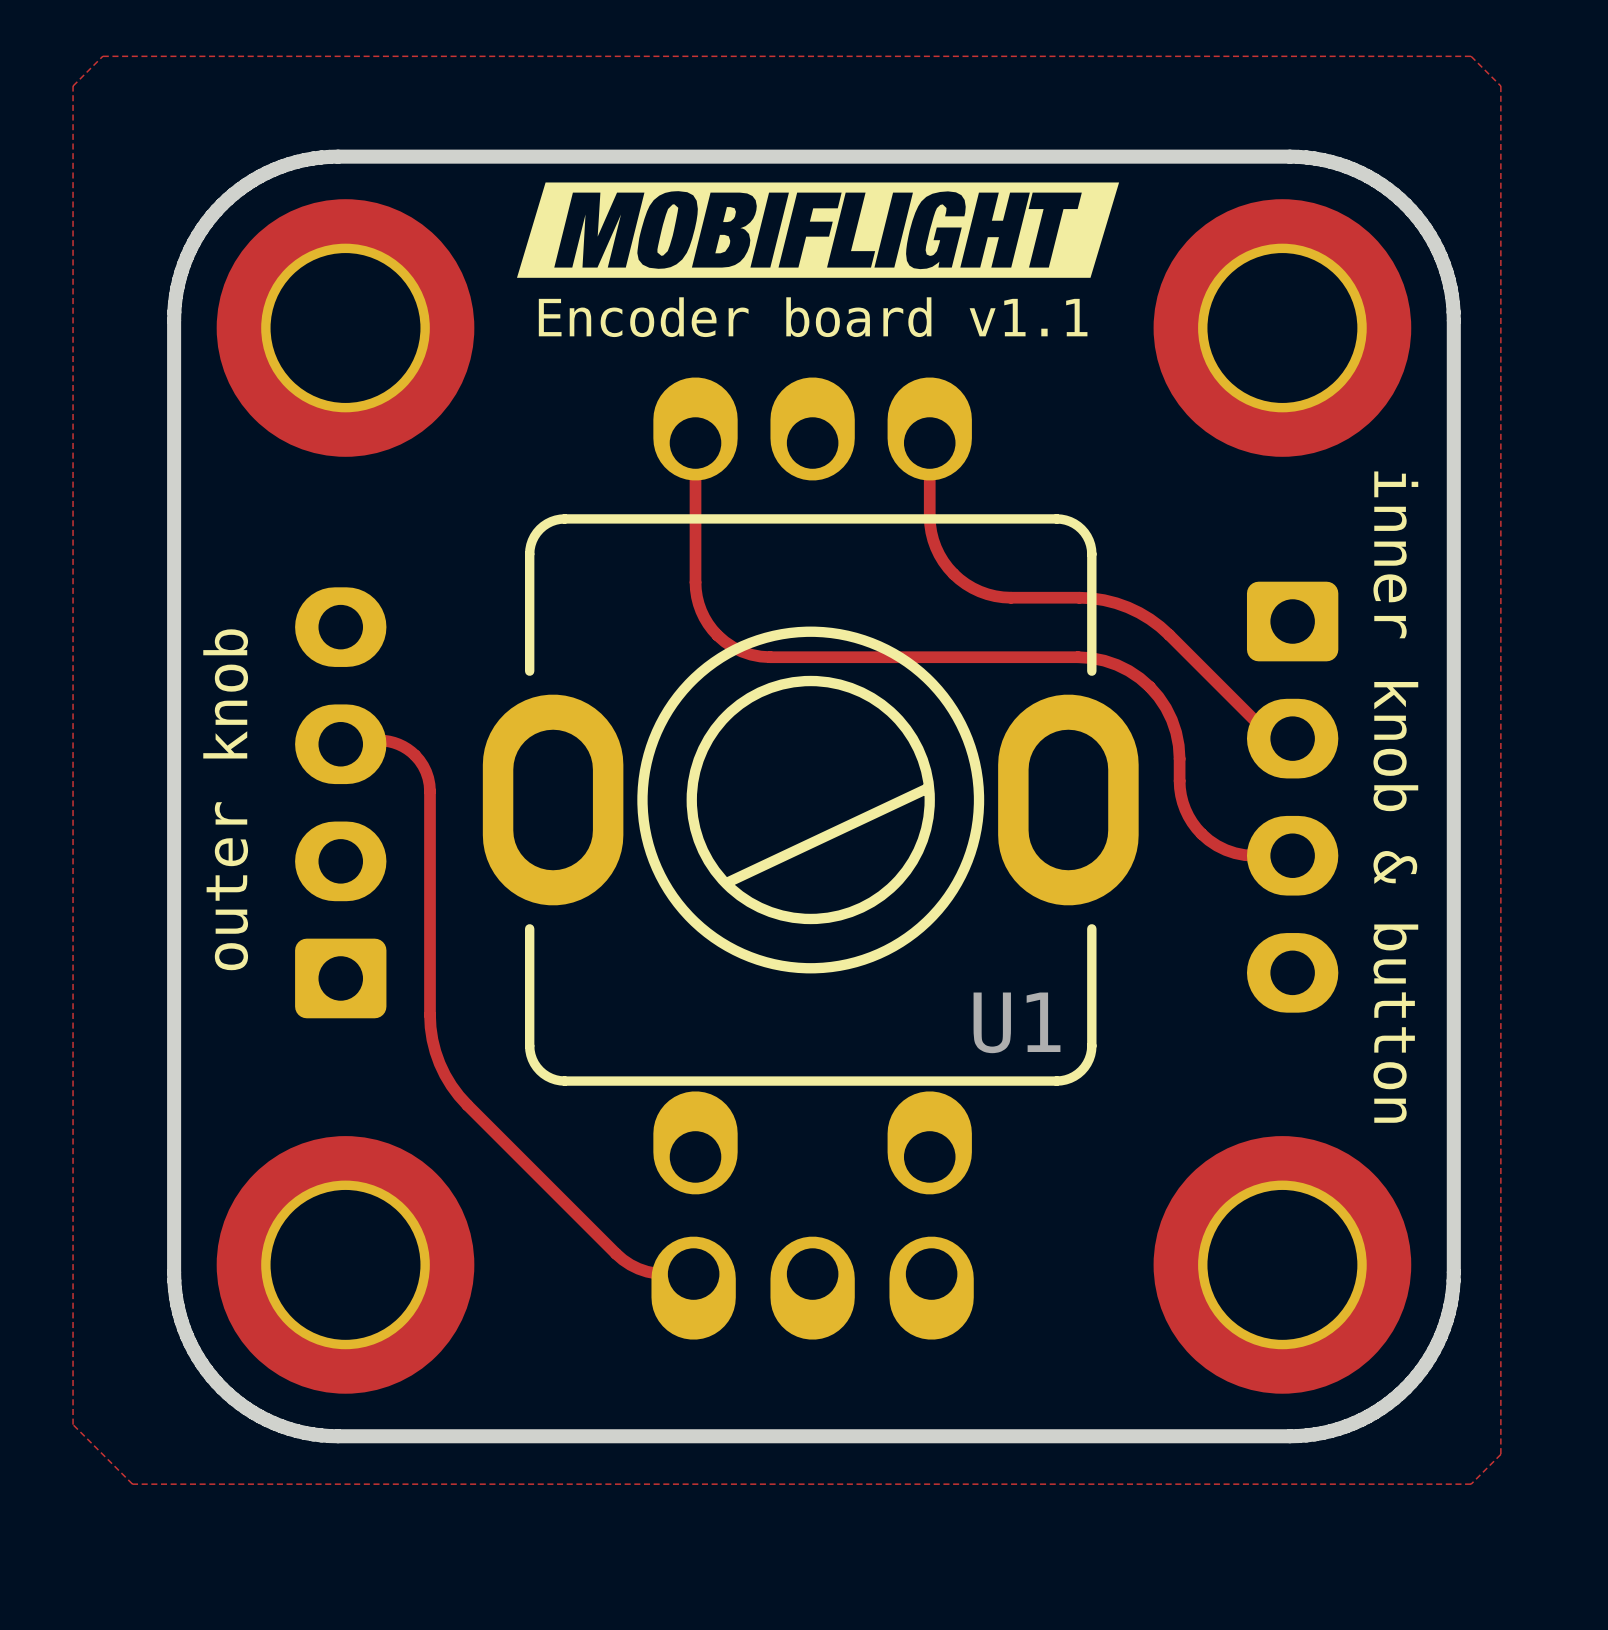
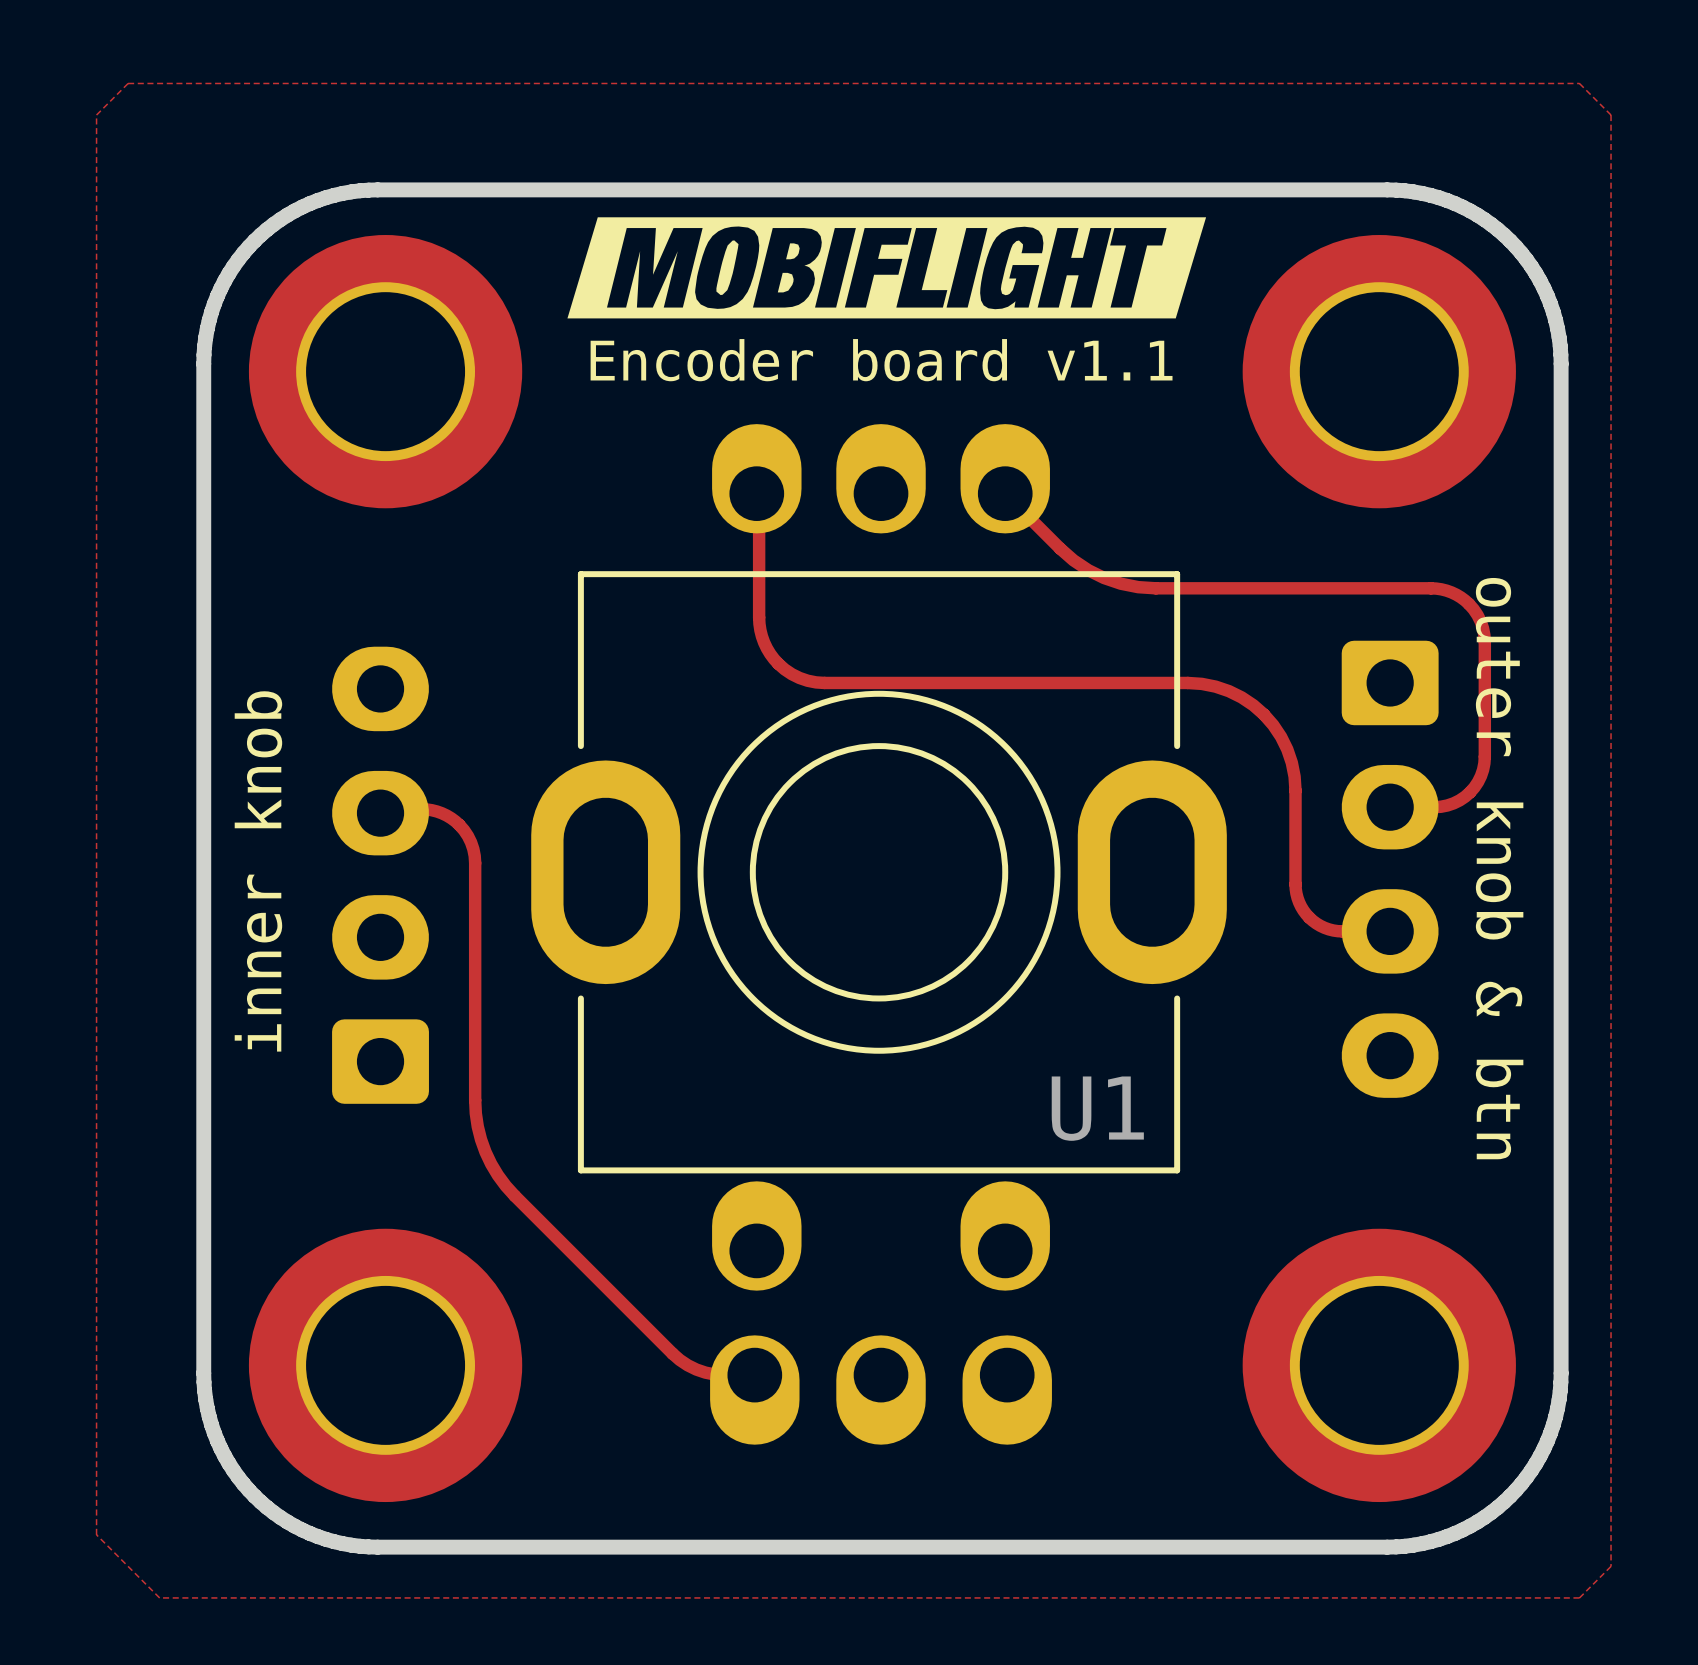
U1 footprint: [482, 377, 1139, 1340] -> [531, 424, 1227, 1445]
track: (695, 443) (695, 589) (704, 617) (712, 629) (724, 641) (750, 654) (770, 657) (1078, 657) (1091, 658) (1116, 664) (1128, 670) (1149, 686) (1158, 696) (1171, 719) (1178, 745) (1181, 795) (1192, 822) (1201, 833) (1217, 845) (1235, 853) (1254, 855) -> (756, 493) (759, 494) (760, 630) (770, 653) (784, 669) (807, 680) (824, 682) (1187, 682) (1201, 683) (1229, 691) (1253, 705) (1263, 714) (1281, 736) (1291, 762) (1295, 790) (1295, 888) (1301, 906) (1309, 917) (1320, 925) (1333, 930) (1349, 931)
track: (929, 443) (931, 532) (939, 554) (948, 568) (959, 579) (972, 588) (995, 596) (1091, 598) (1116, 603) (1139, 612) (1169, 635) (1268, 733) (1276, 737) (1292, 738) -> (1005, 493) (1073, 560) (1088, 570) (1120, 583) (1155, 588) (1430, 588) (1446, 590) (1465, 600) (1477, 615) (1484, 635) (1484, 756) (1480, 776) (1470, 792) (1453, 803) (1434, 807) (1390, 807)
text: inner knob & button (1395, 797) -> outer knob & btn (1499, 868)
text: outer knob (225, 799) -> inner knob (258, 871)

